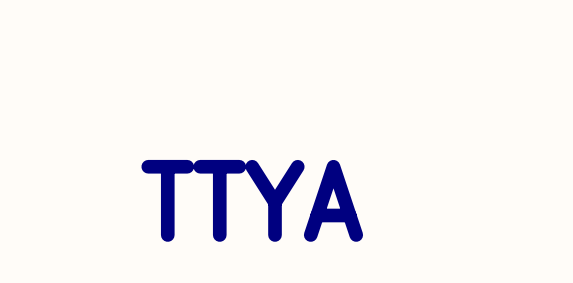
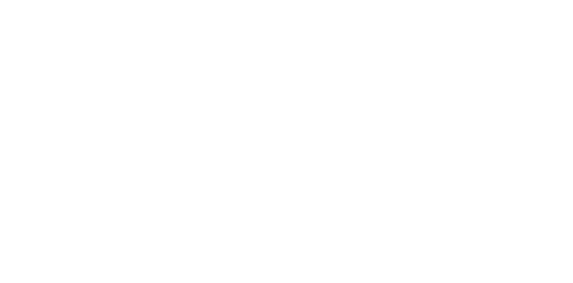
text: TTYA (252, 200) -> none

